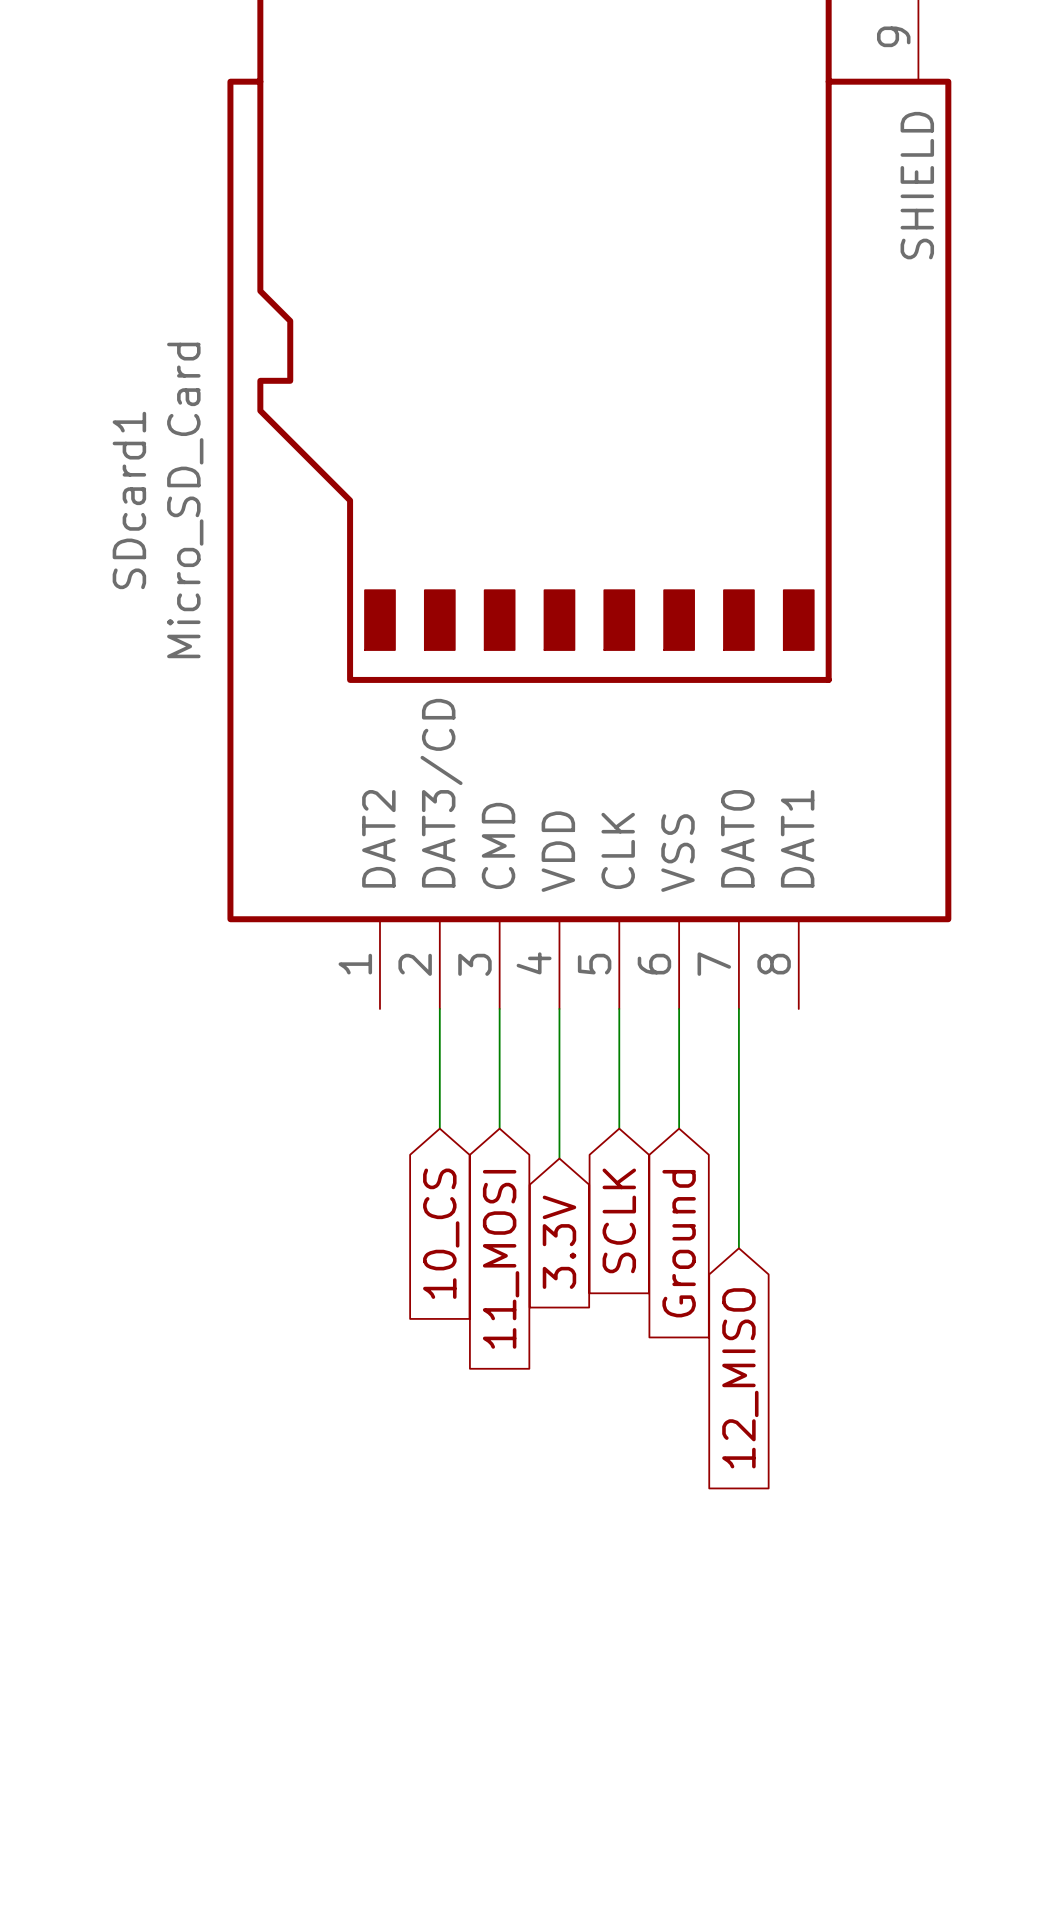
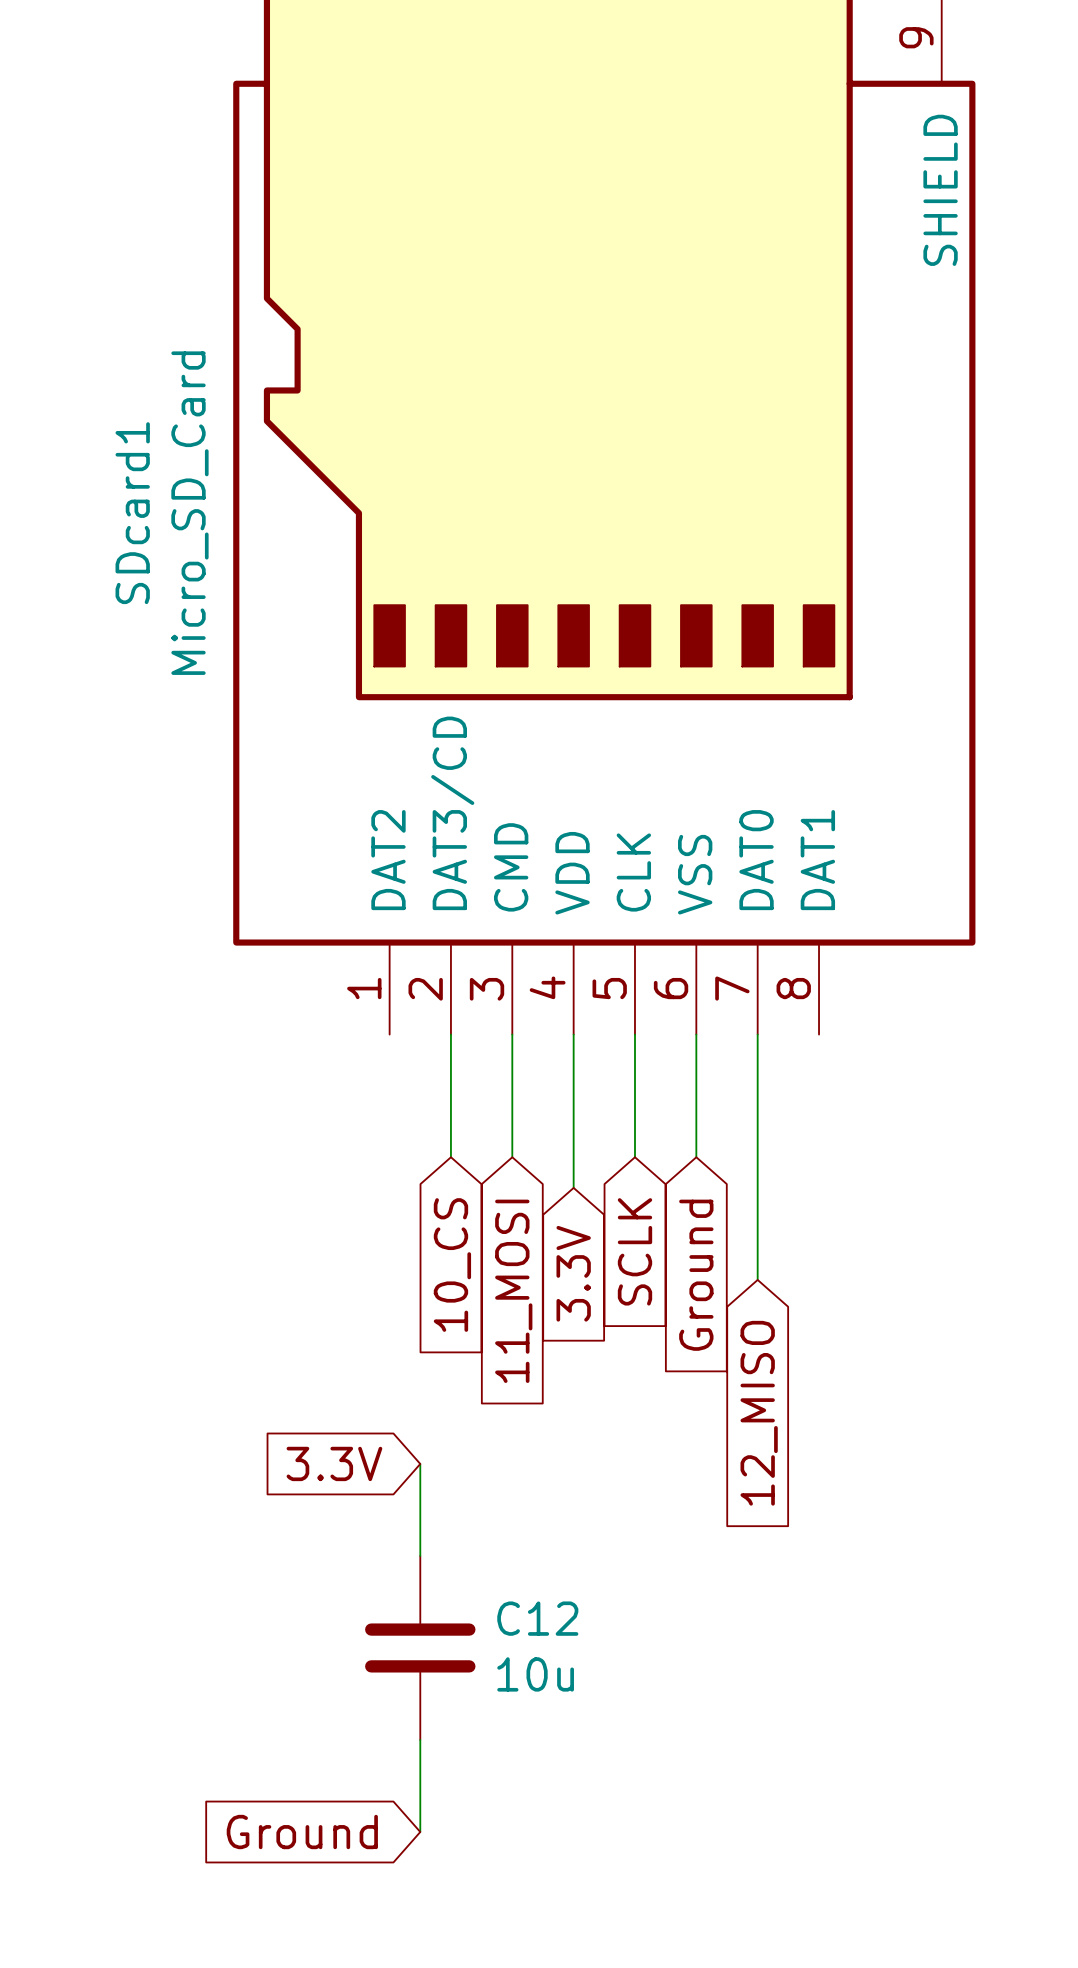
global label: none -> 3.3V (334, 1463)
wire: none -> (420, 1463) (420, 1555)
C12: none -> 10u (420, 1647)
wire: none -> (420, 1739) (420, 1832)
global label: none -> Ground (302, 1832)

